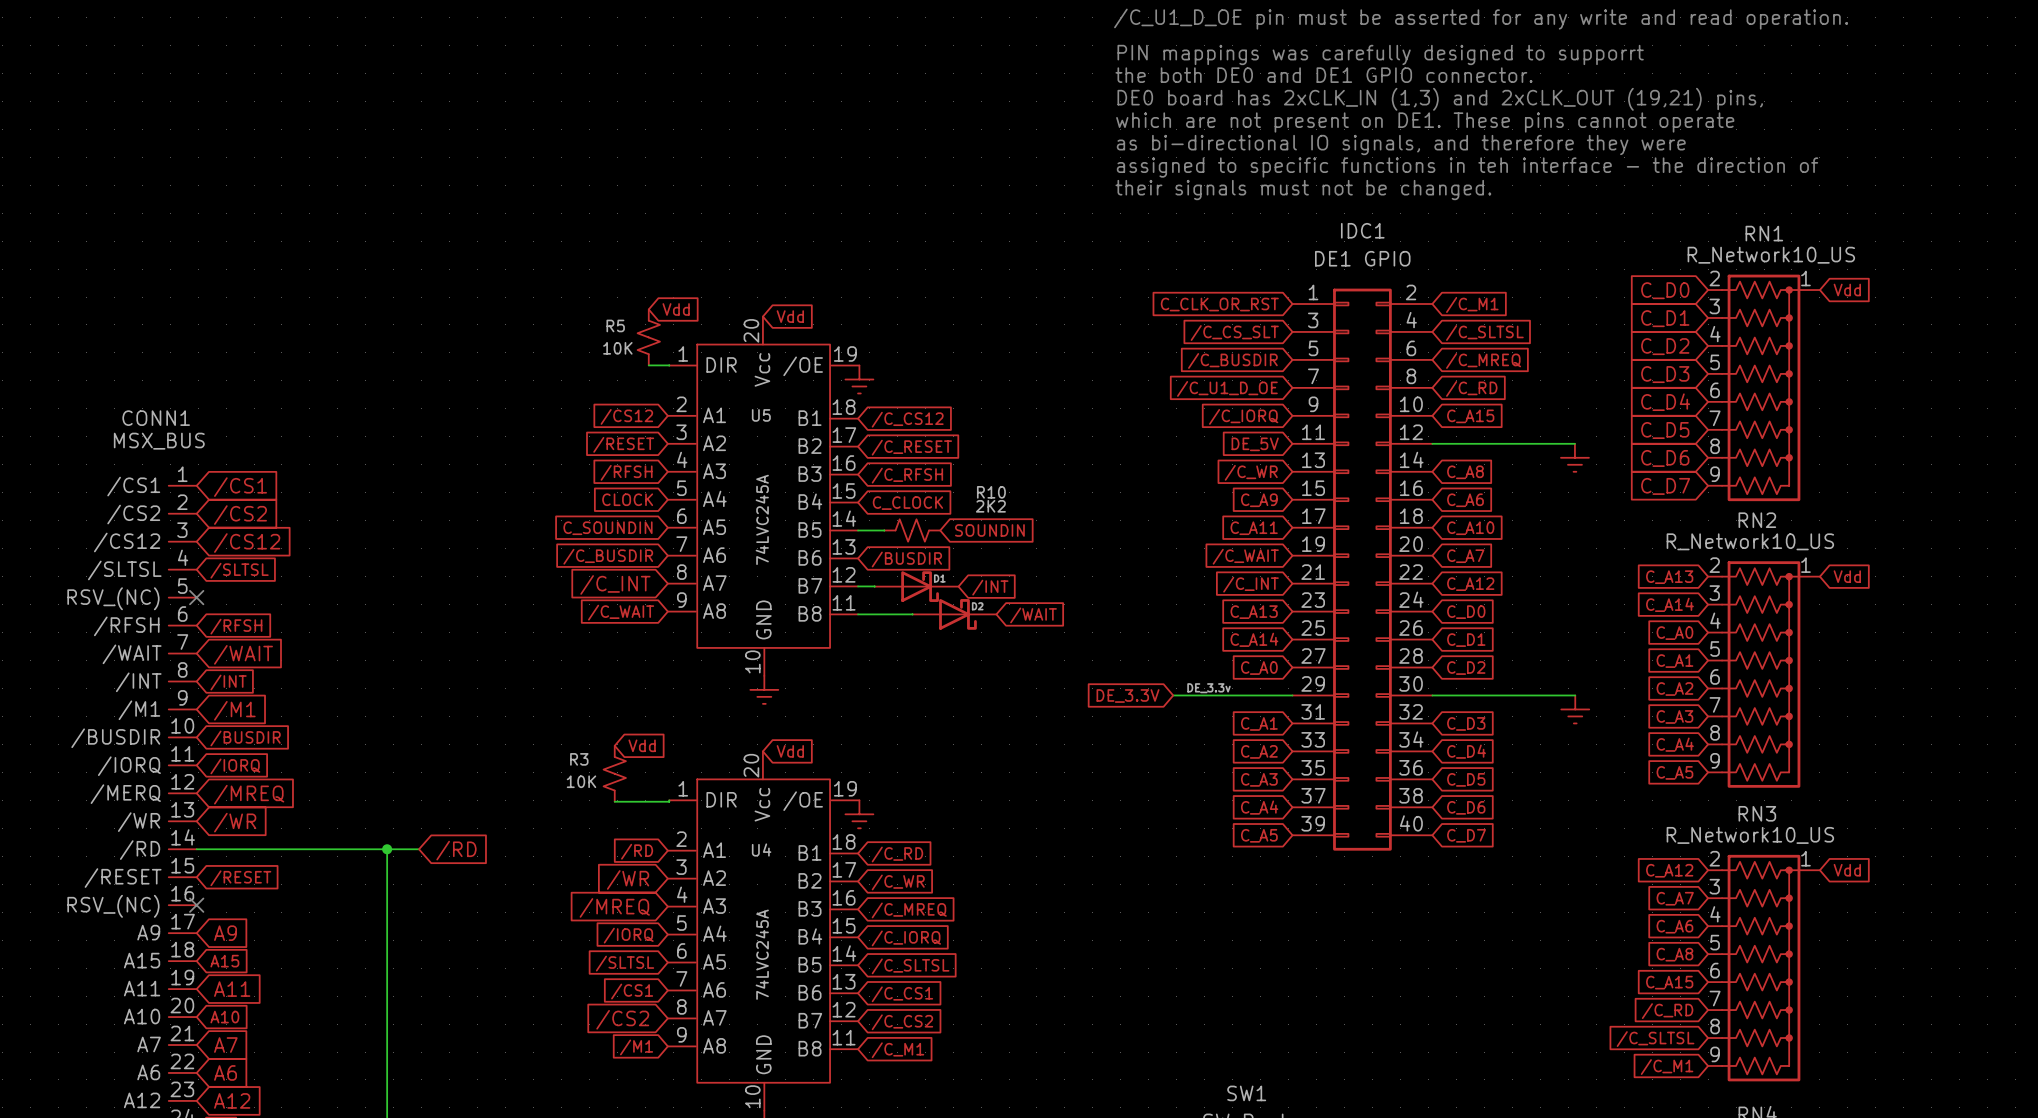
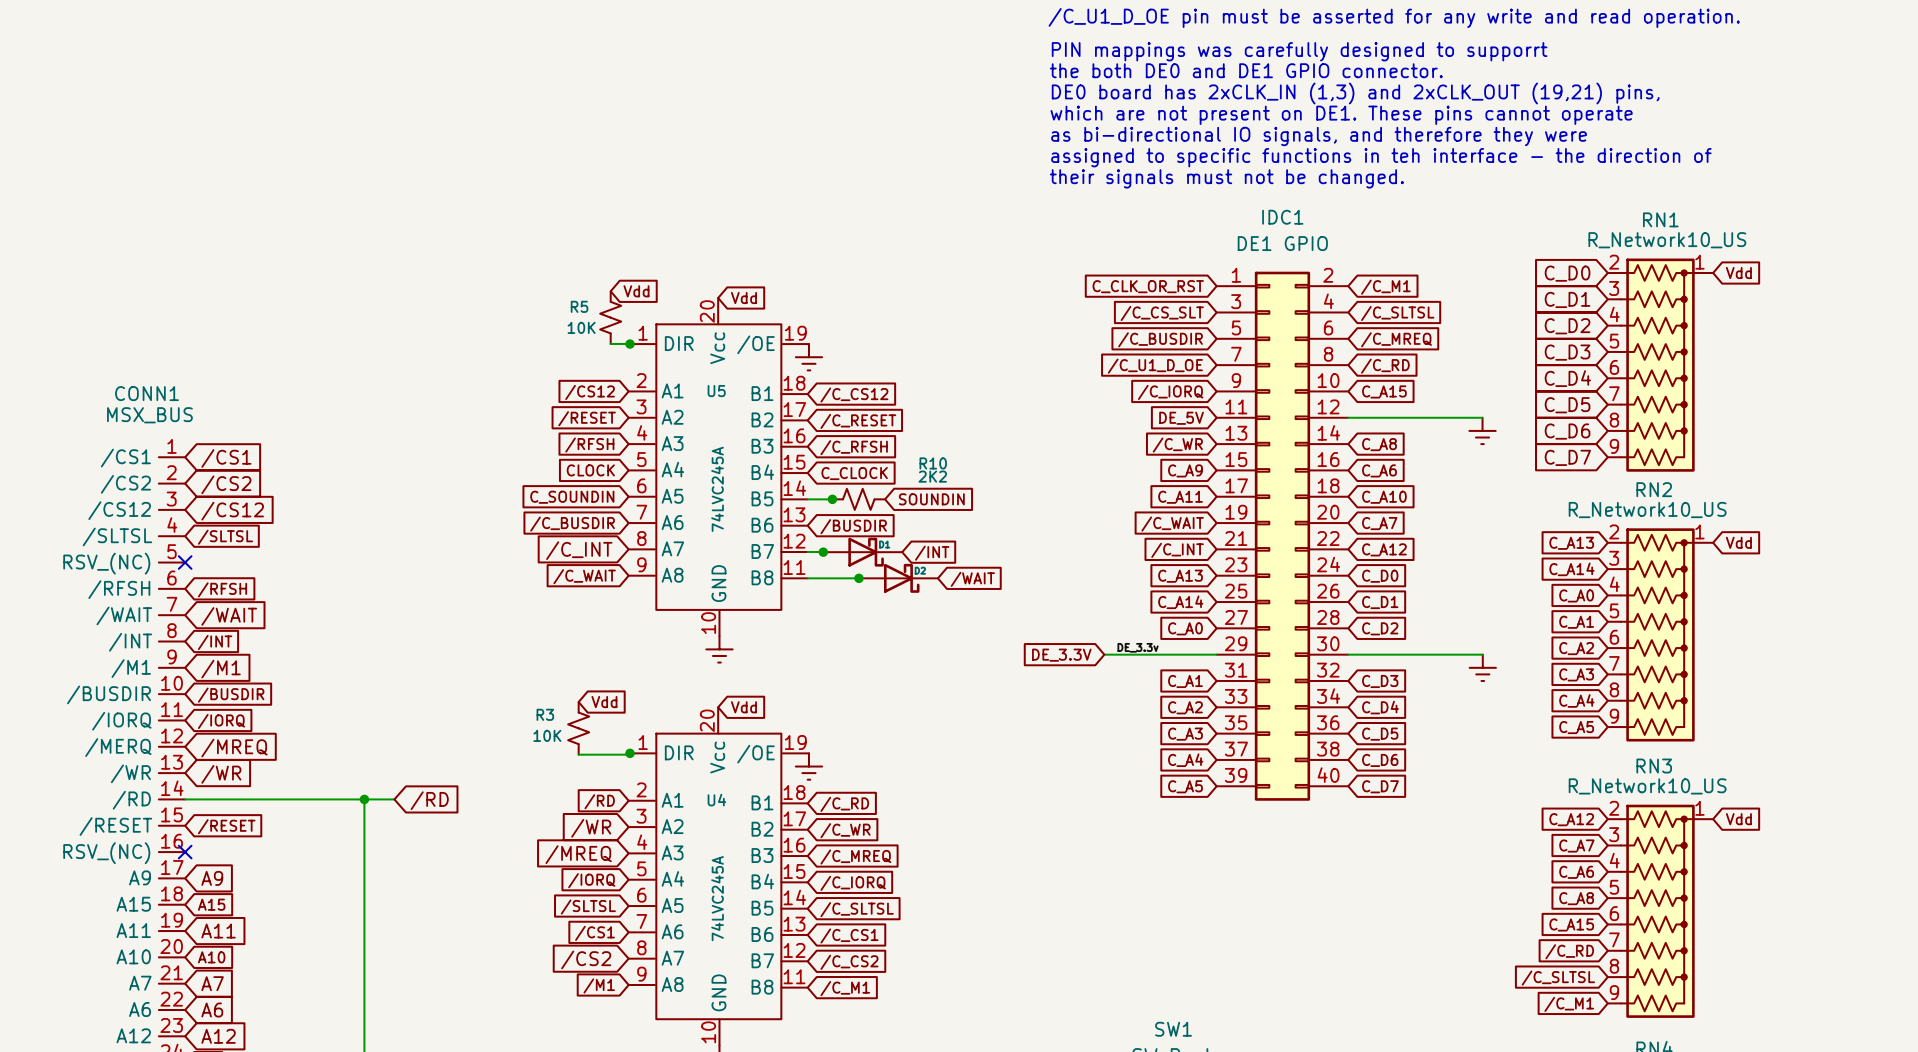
junction: none -> (629, 344)
junction: none -> (832, 499)
junction: none -> (823, 552)
junction: none -> (858, 578)
junction: none -> (629, 753)

